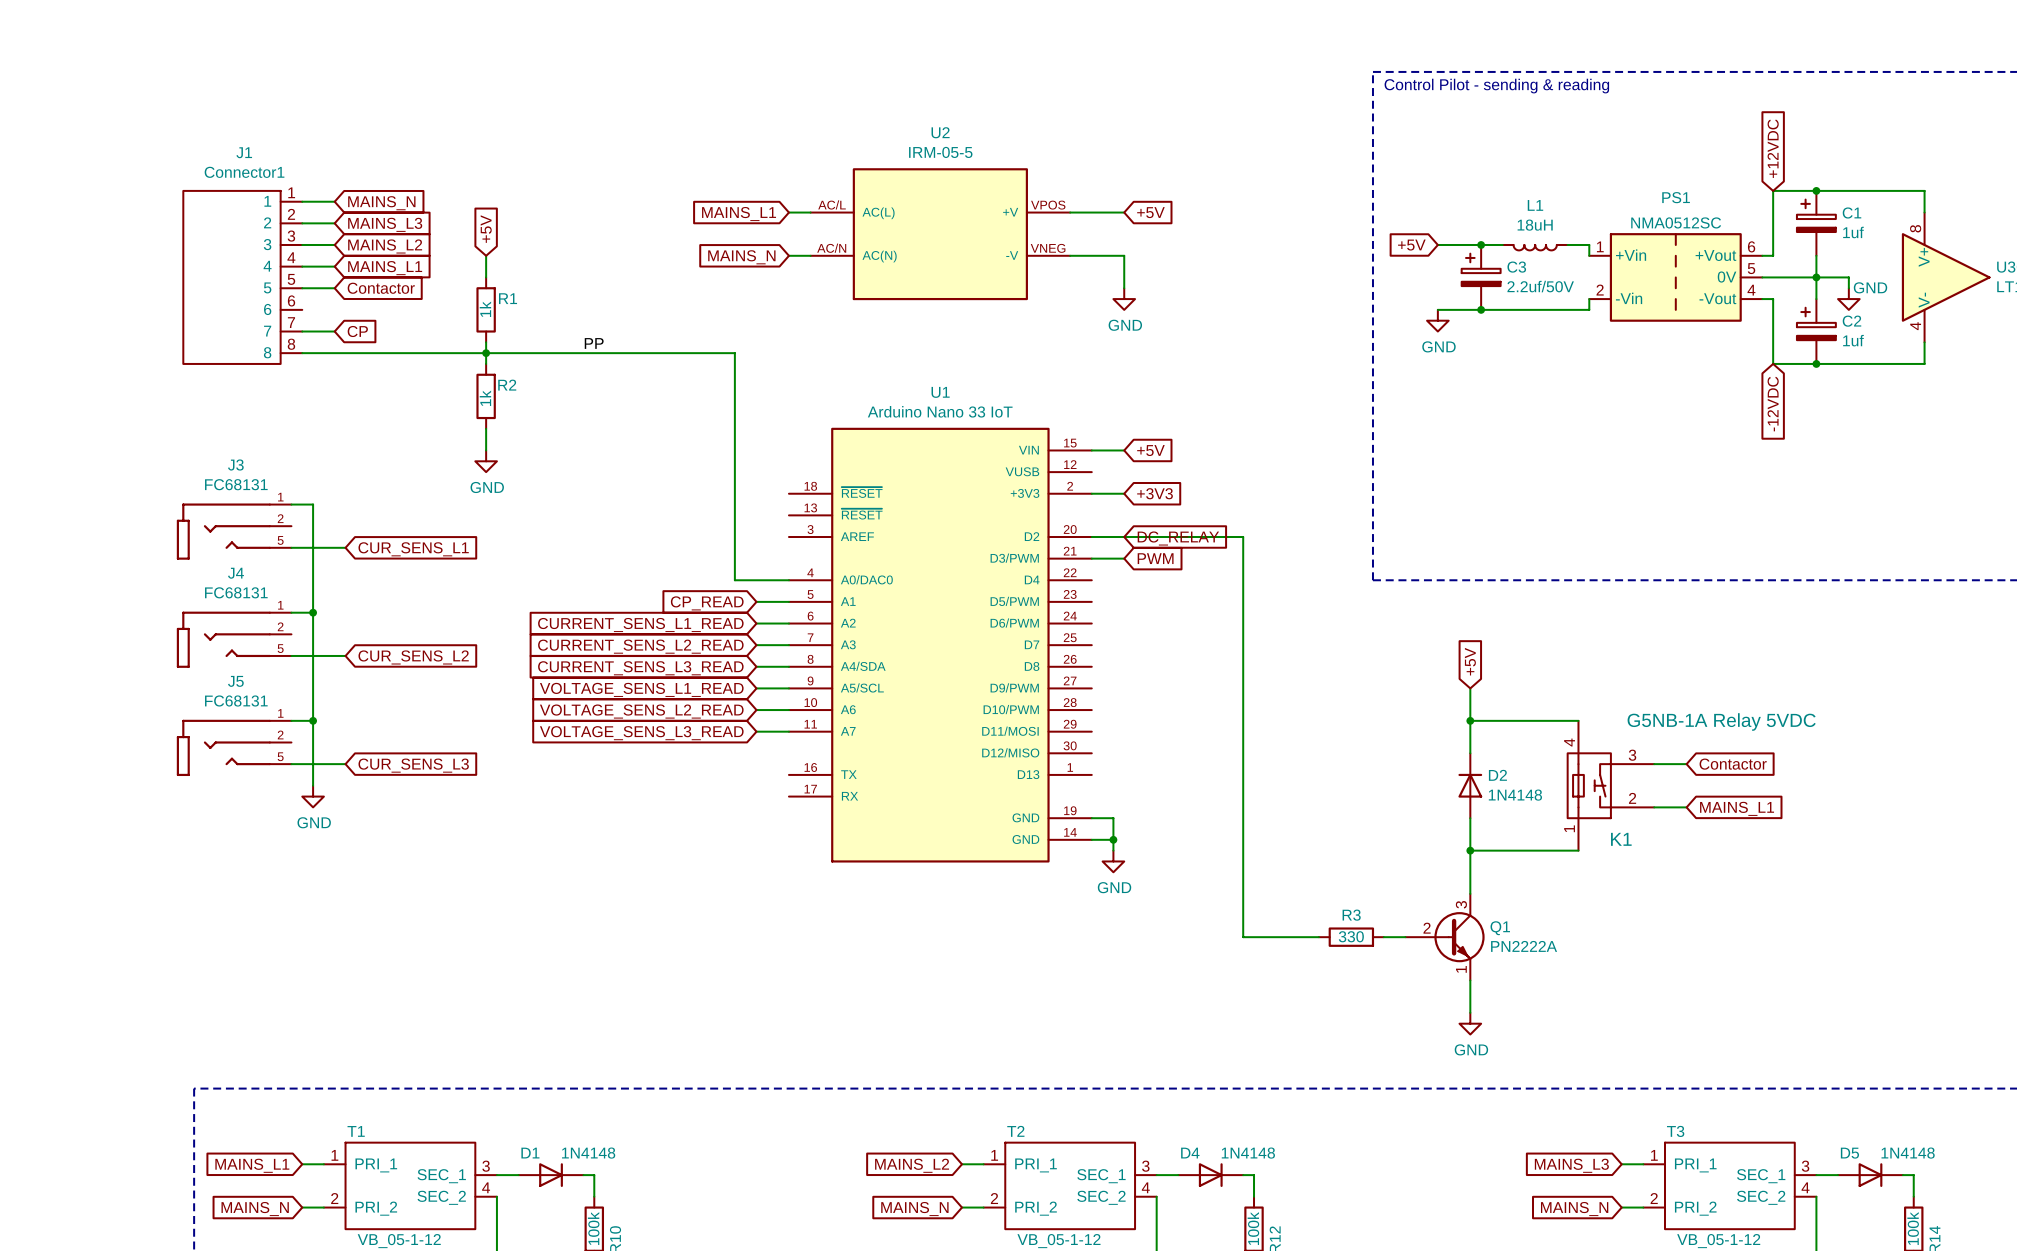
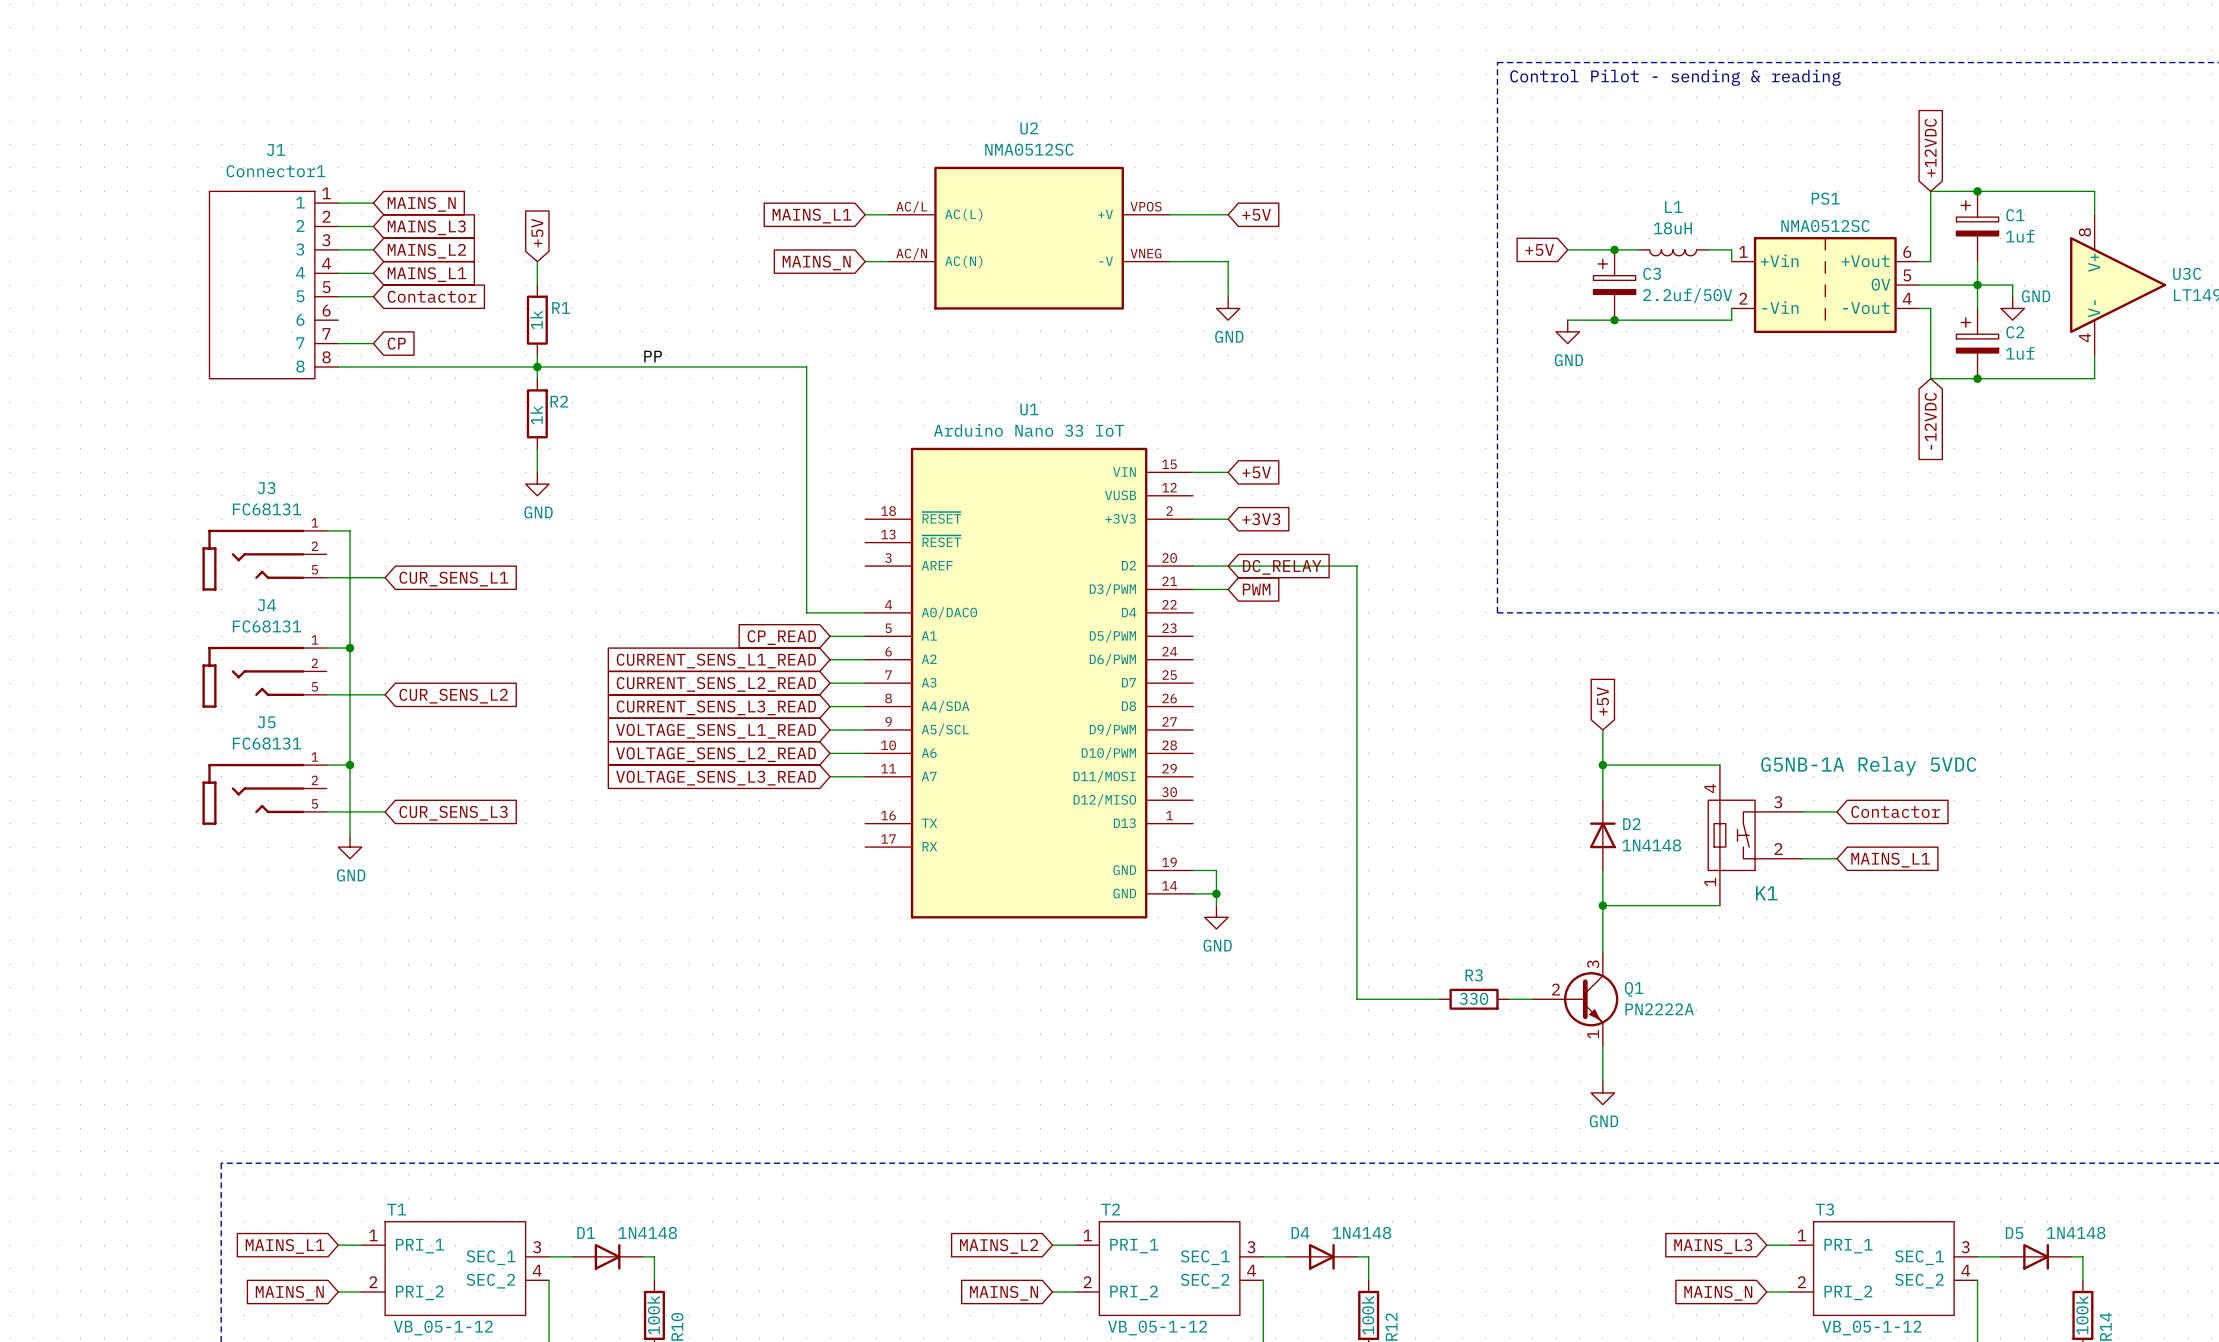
U2 value: IRM-05-5 (940, 152) -> NMA0512SC (1029, 149)

